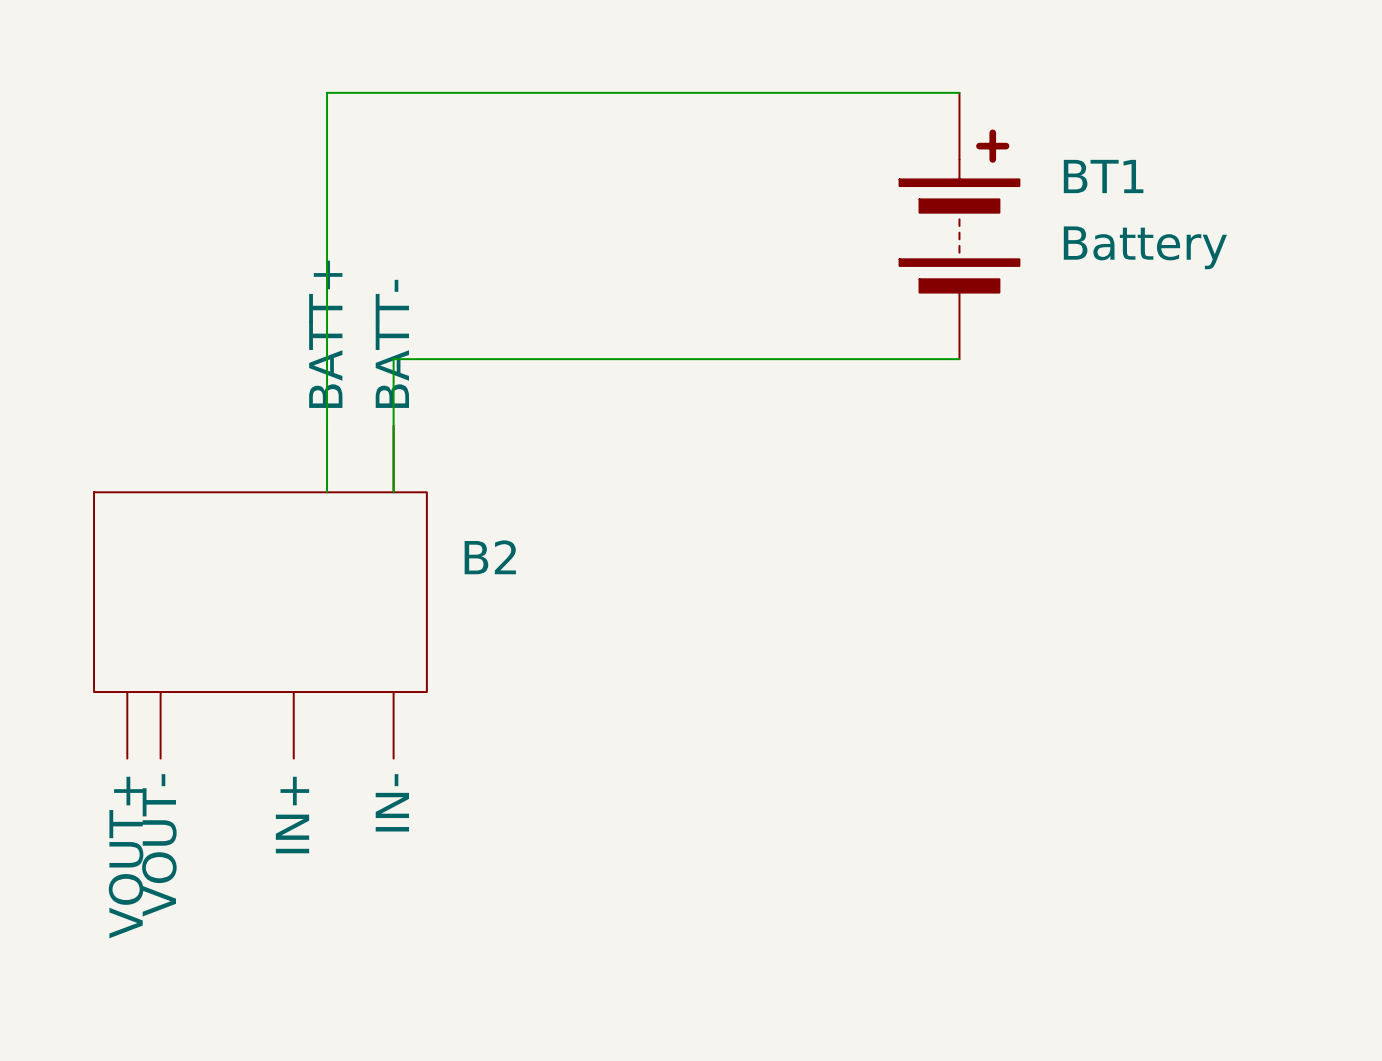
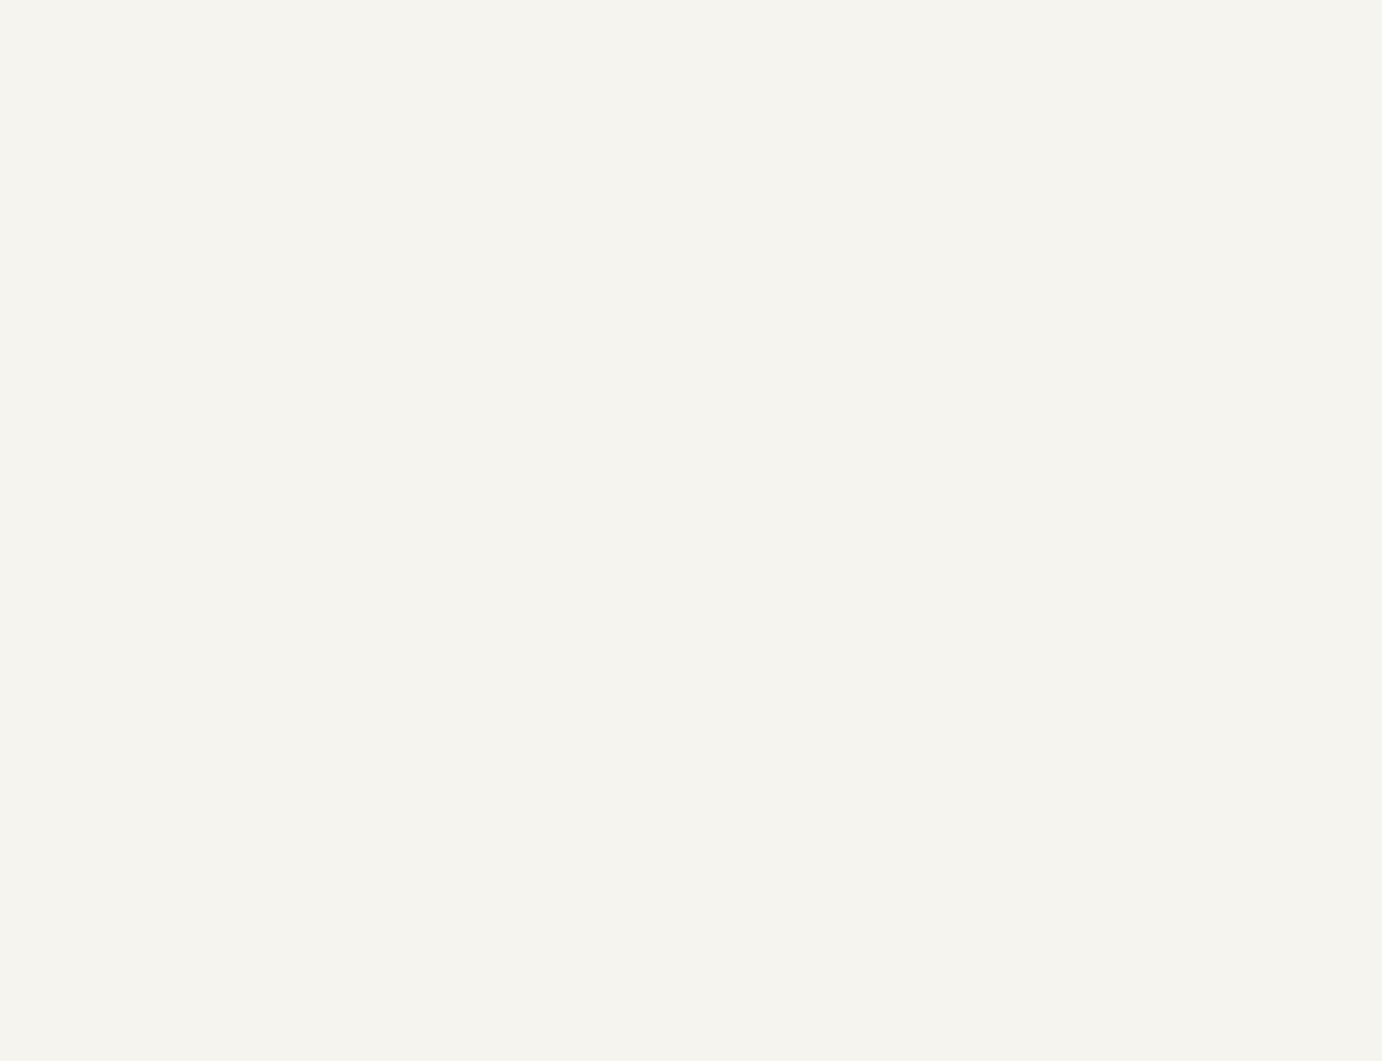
wire: (959, 92) (327, 92) (327, 492) -> none
BT1: Battery (959, 226) -> none
wire: (959, 359) (393, 359) (393, 492) -> none
B2: (260, 592) -> none

